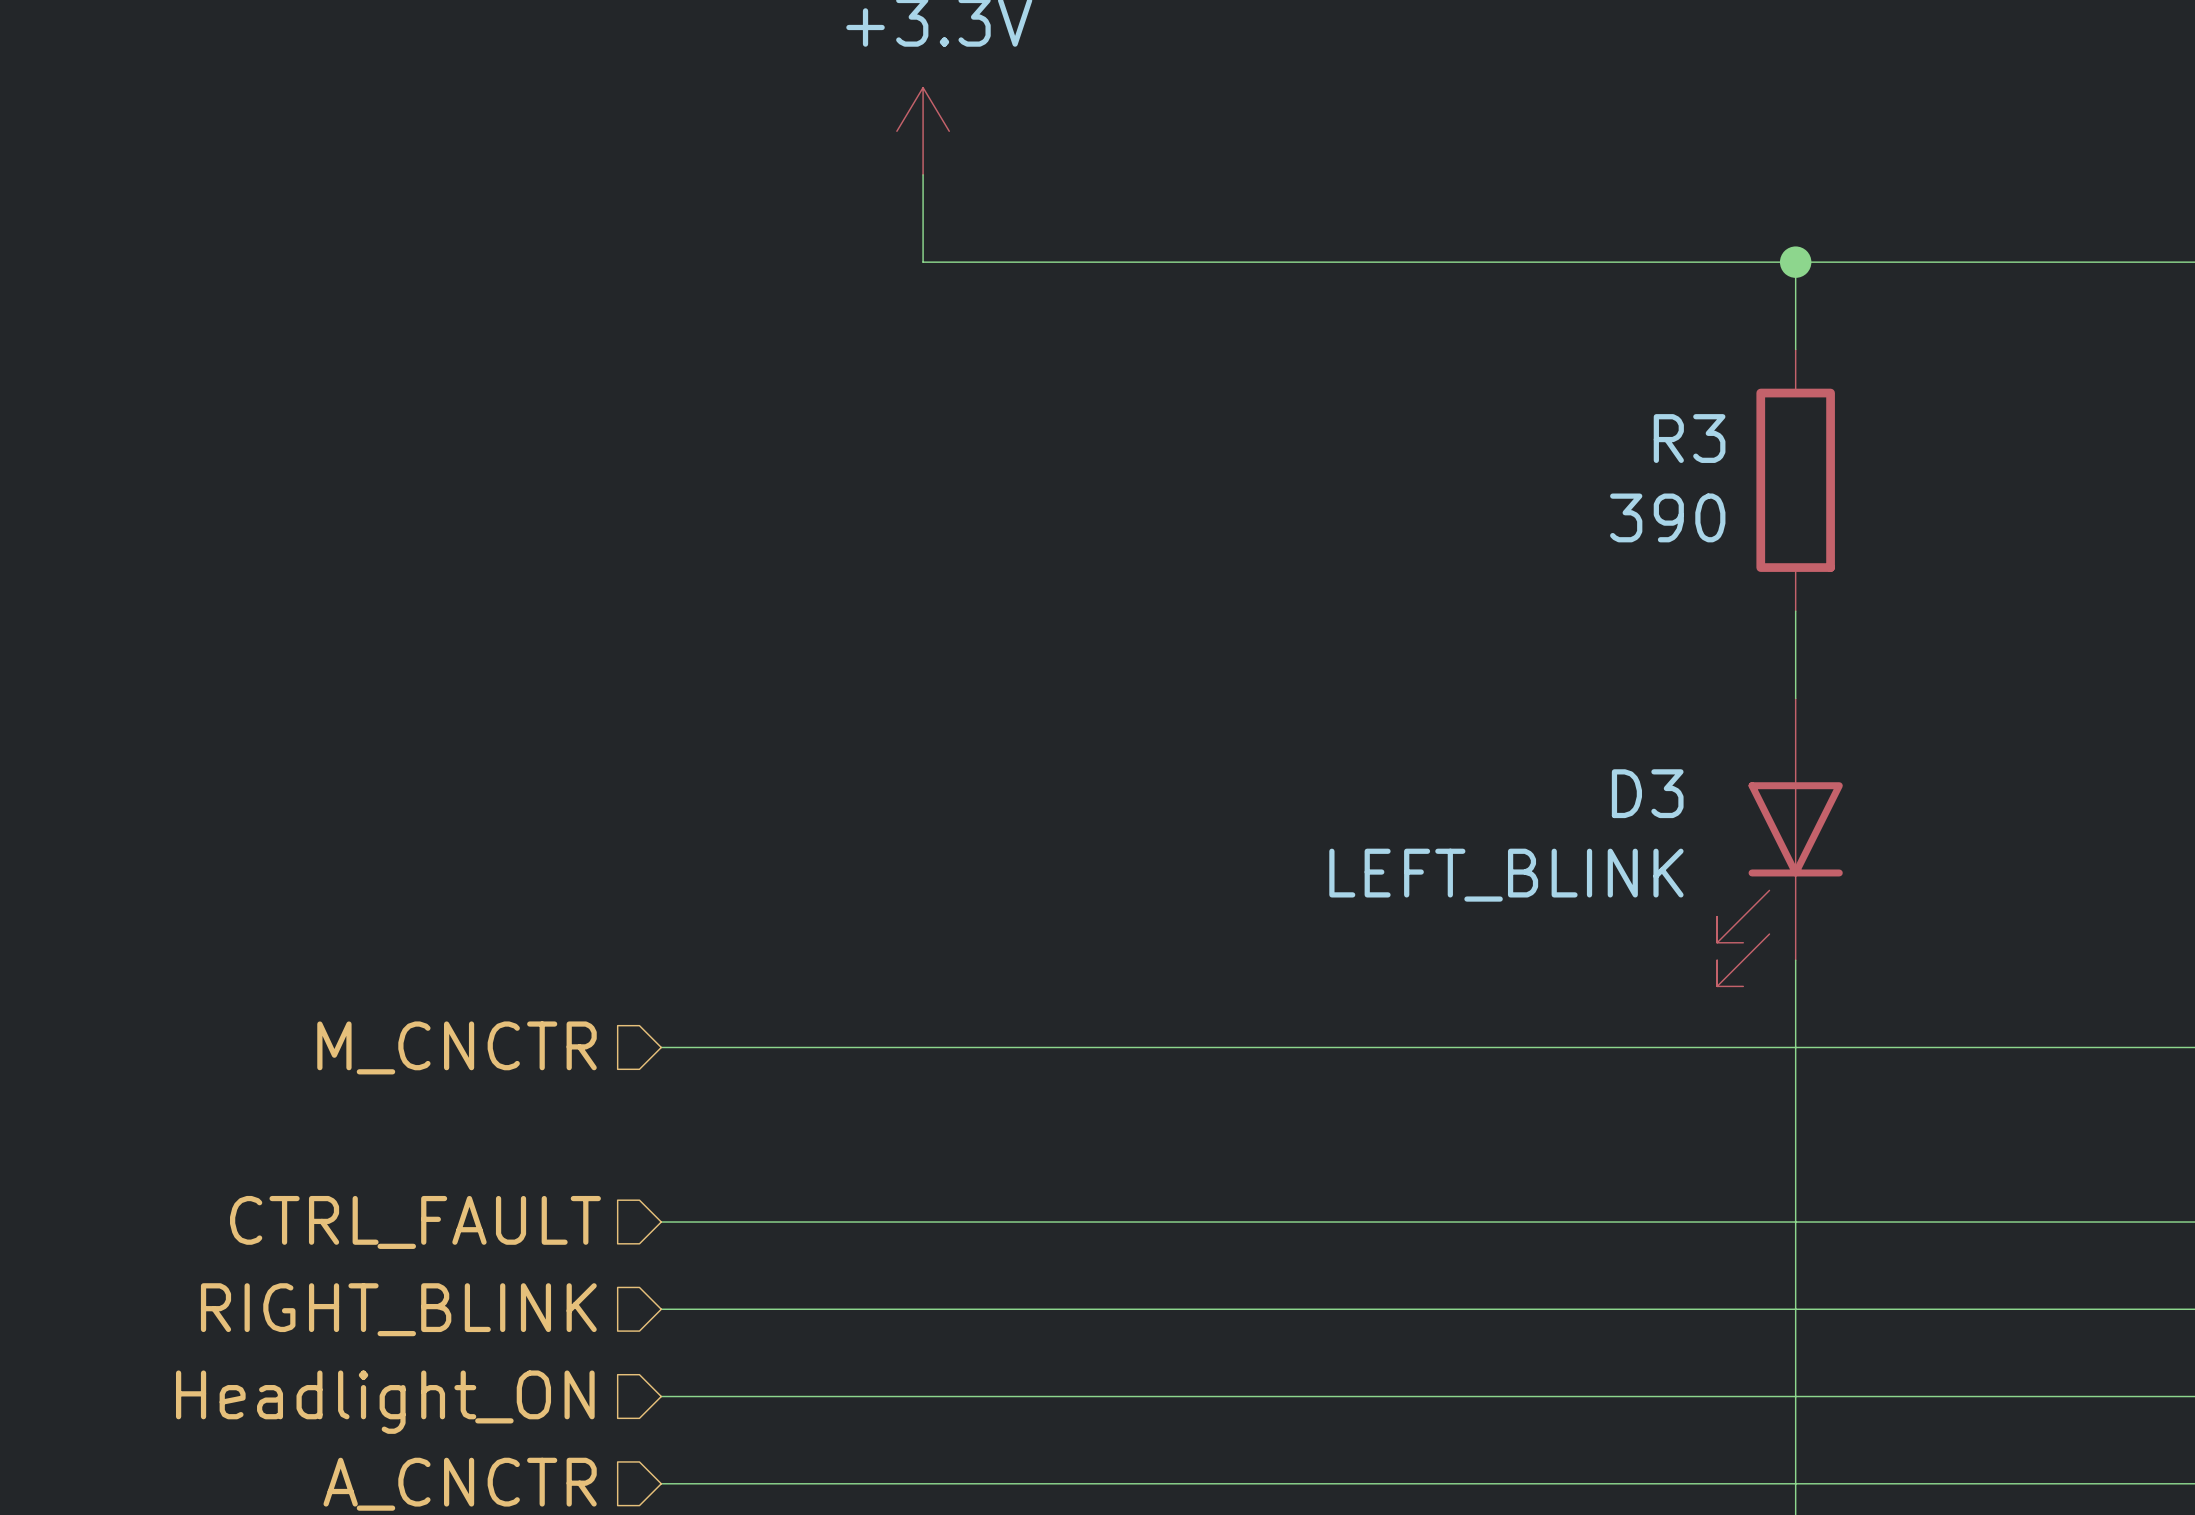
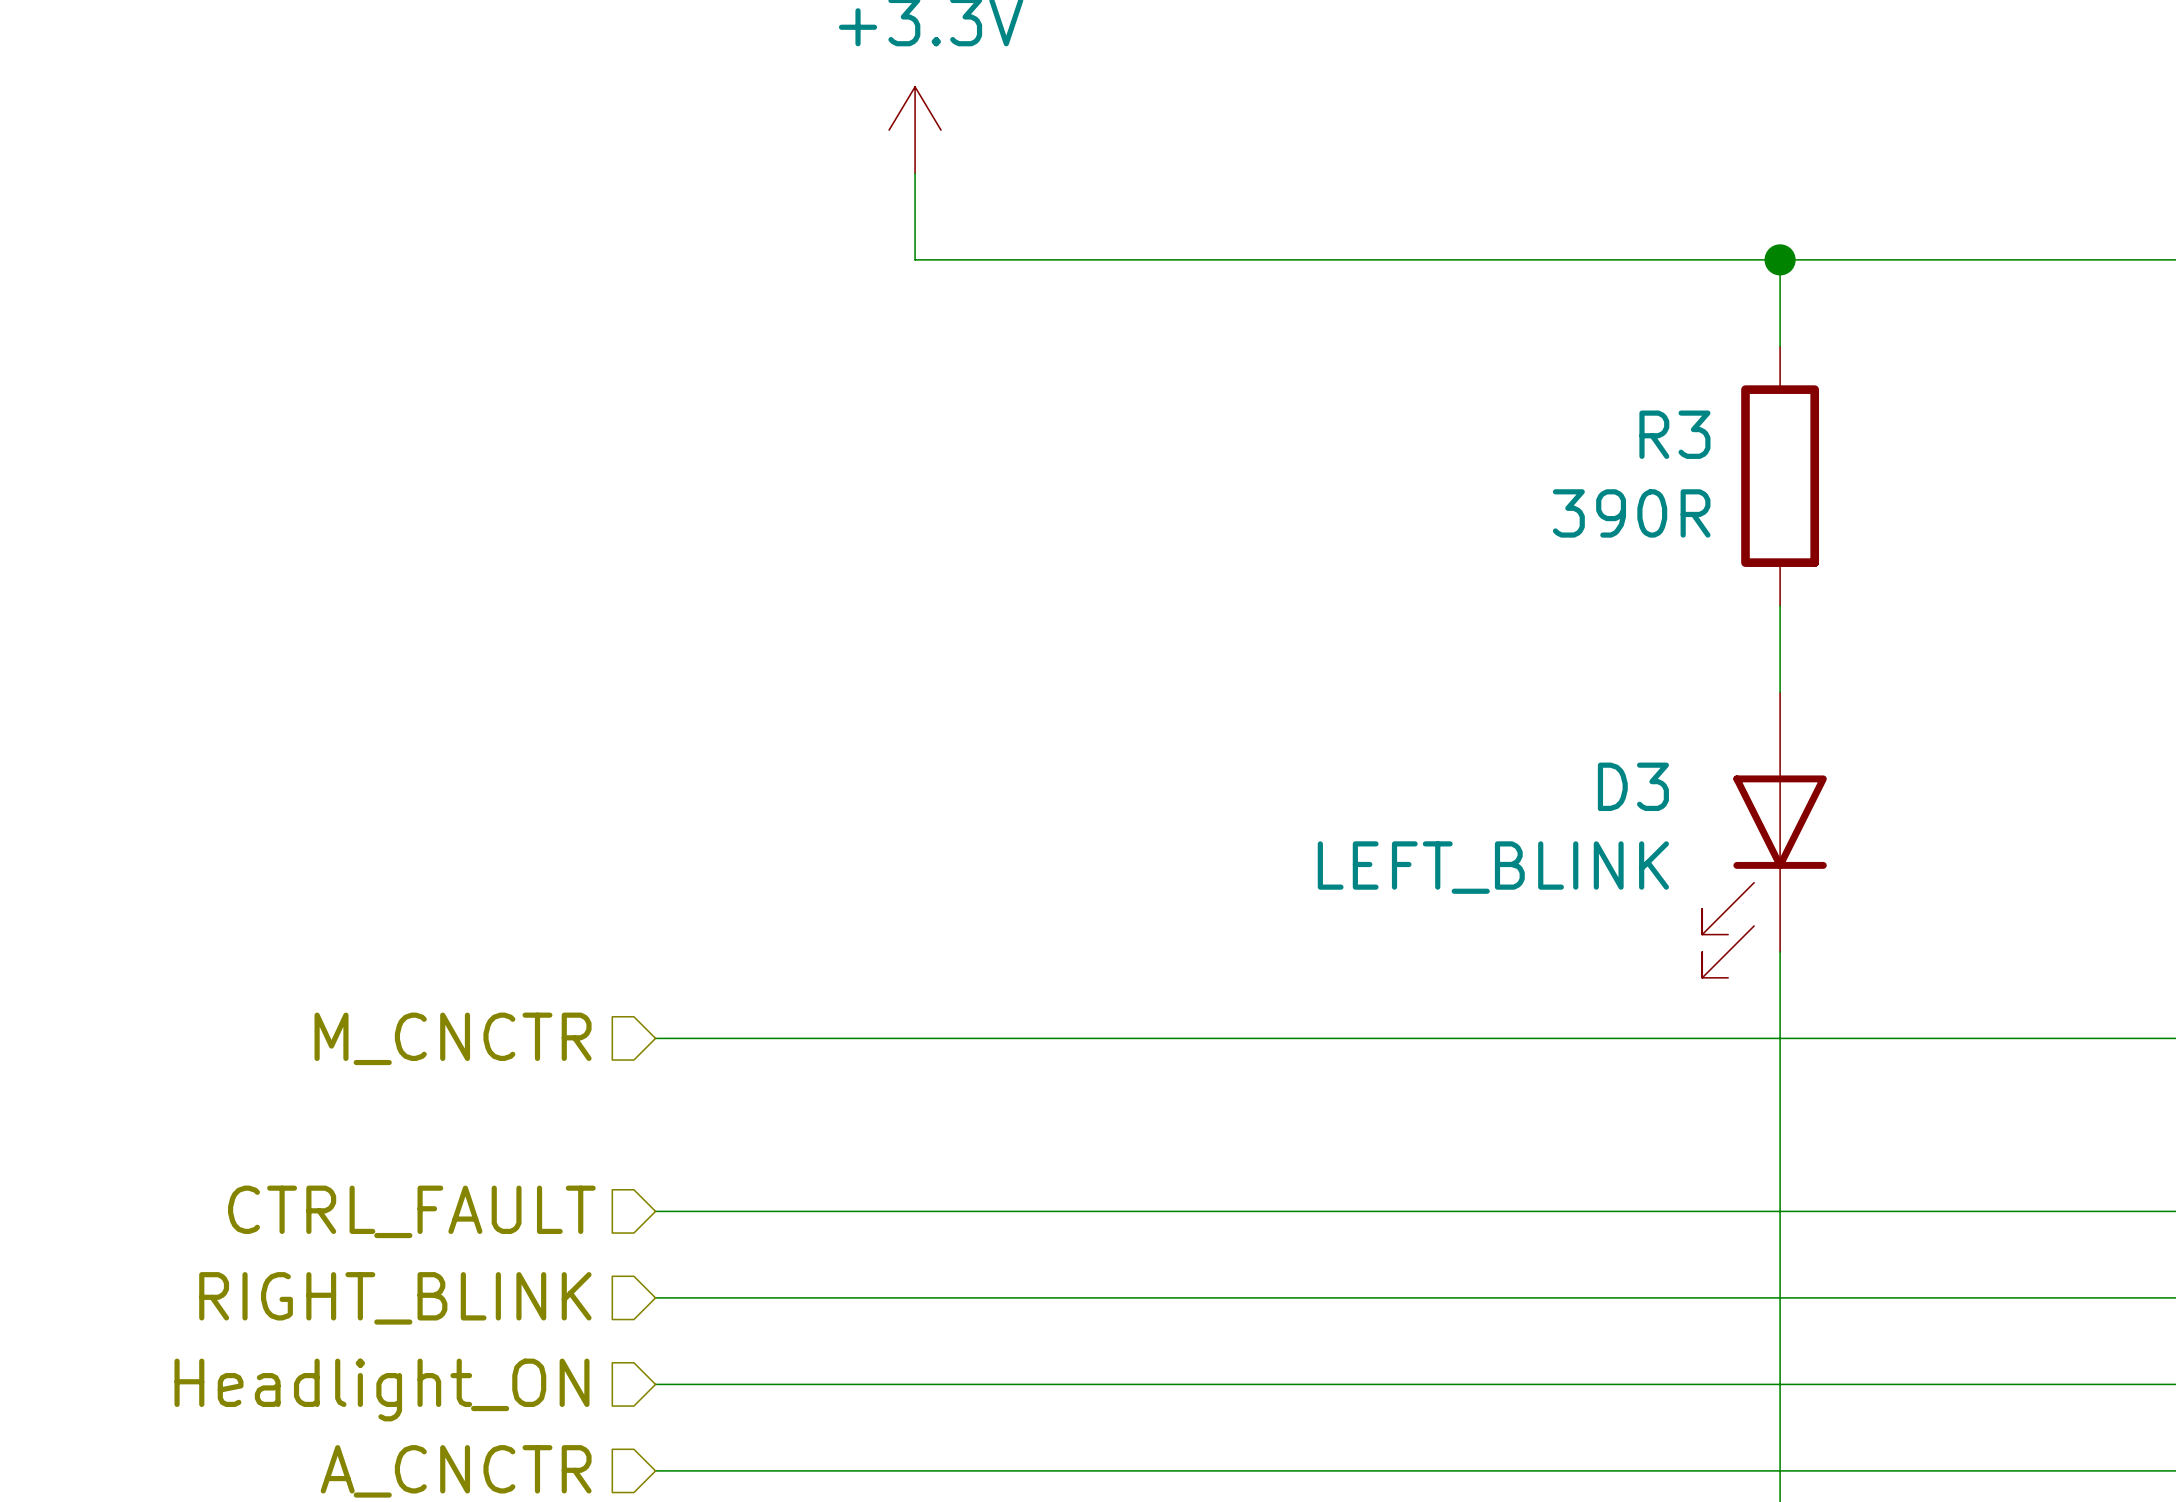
R3 value: 390 (1667, 517) -> 390R (1631, 513)

